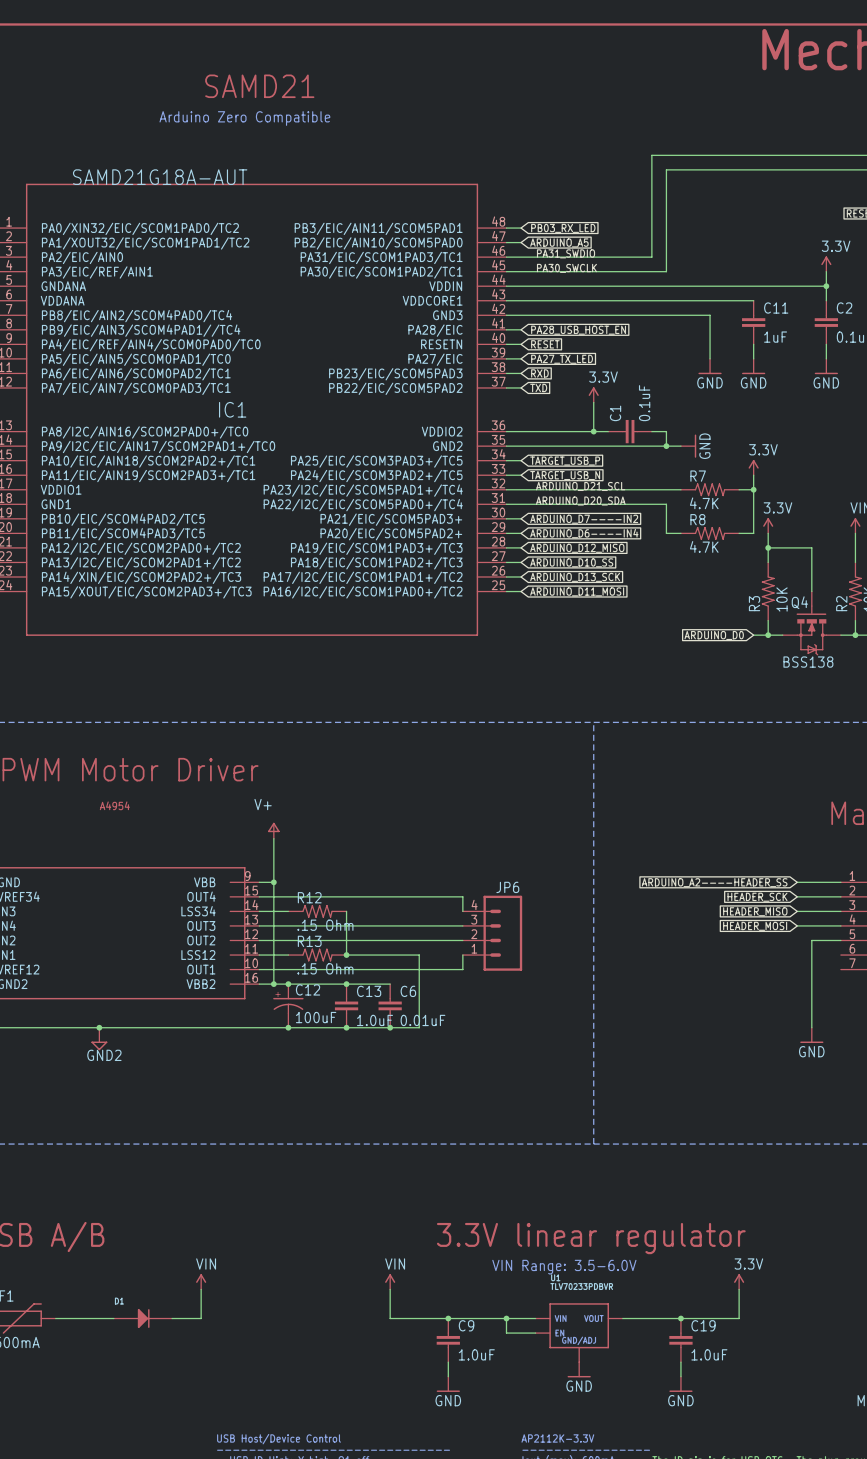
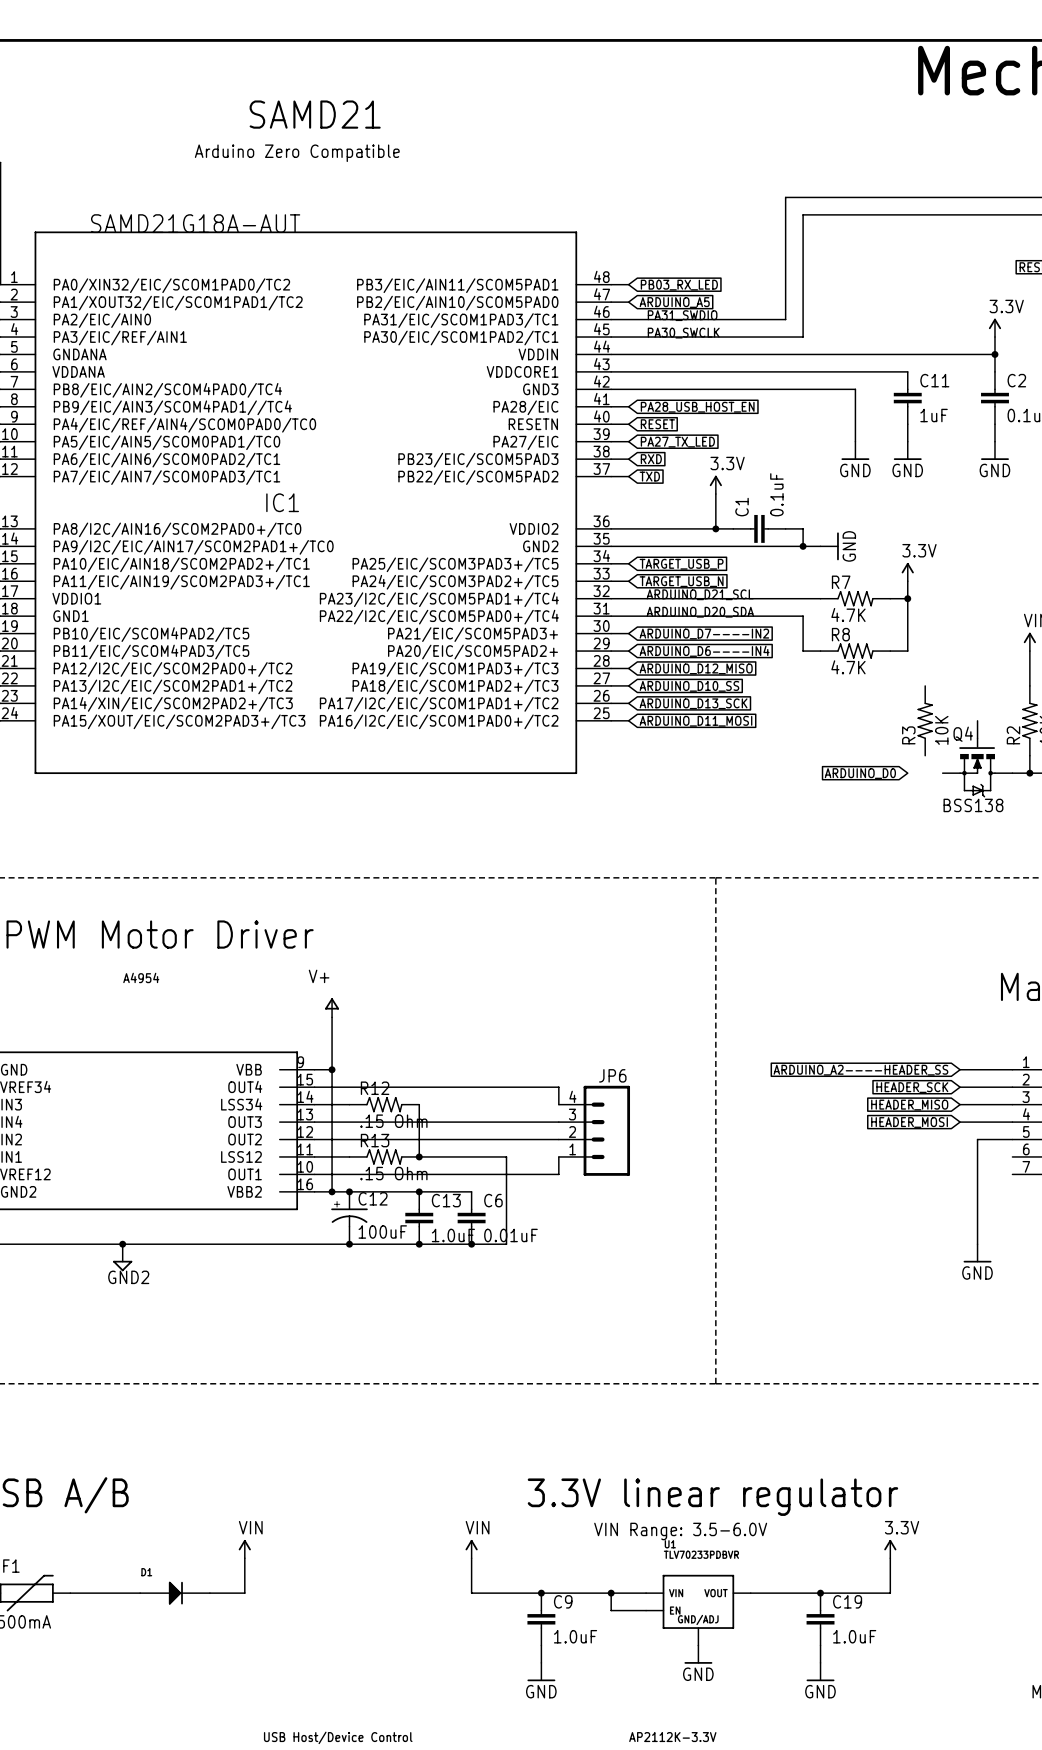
power symbol: 3.3V (768, 525) -> none
wire: (768, 533) (768, 562) -> none
wire: (768, 547) (811, 547) (811, 591) -> none
junction: (768, 547) -> none
wire: (768, 620) (768, 635) -> none
wire: (753, 635) (782, 635) -> none
junction: (768, 635) -> none

